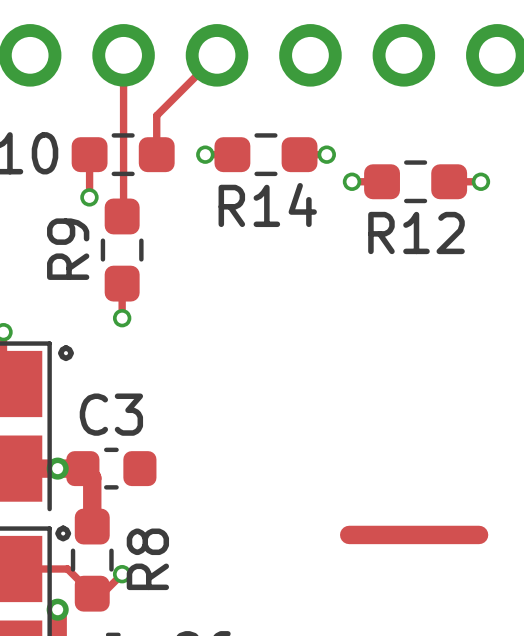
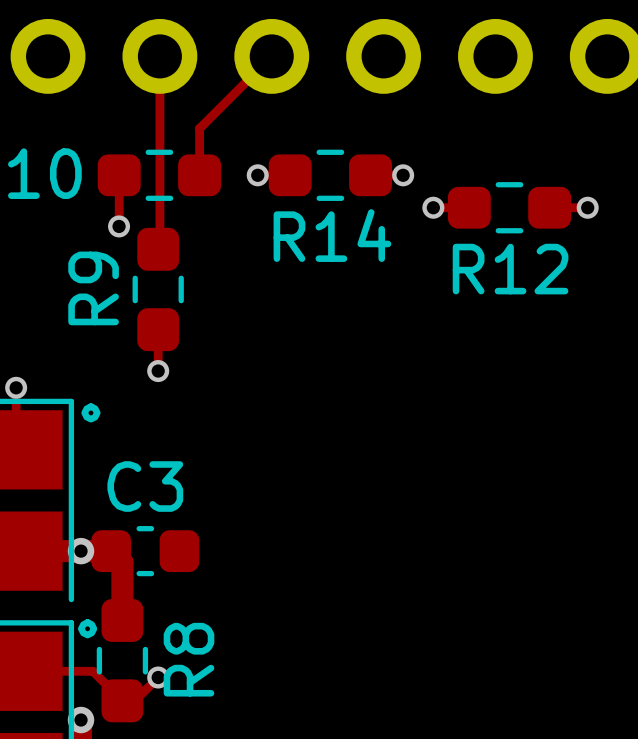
track: (349, 534) (479, 534) -> none

